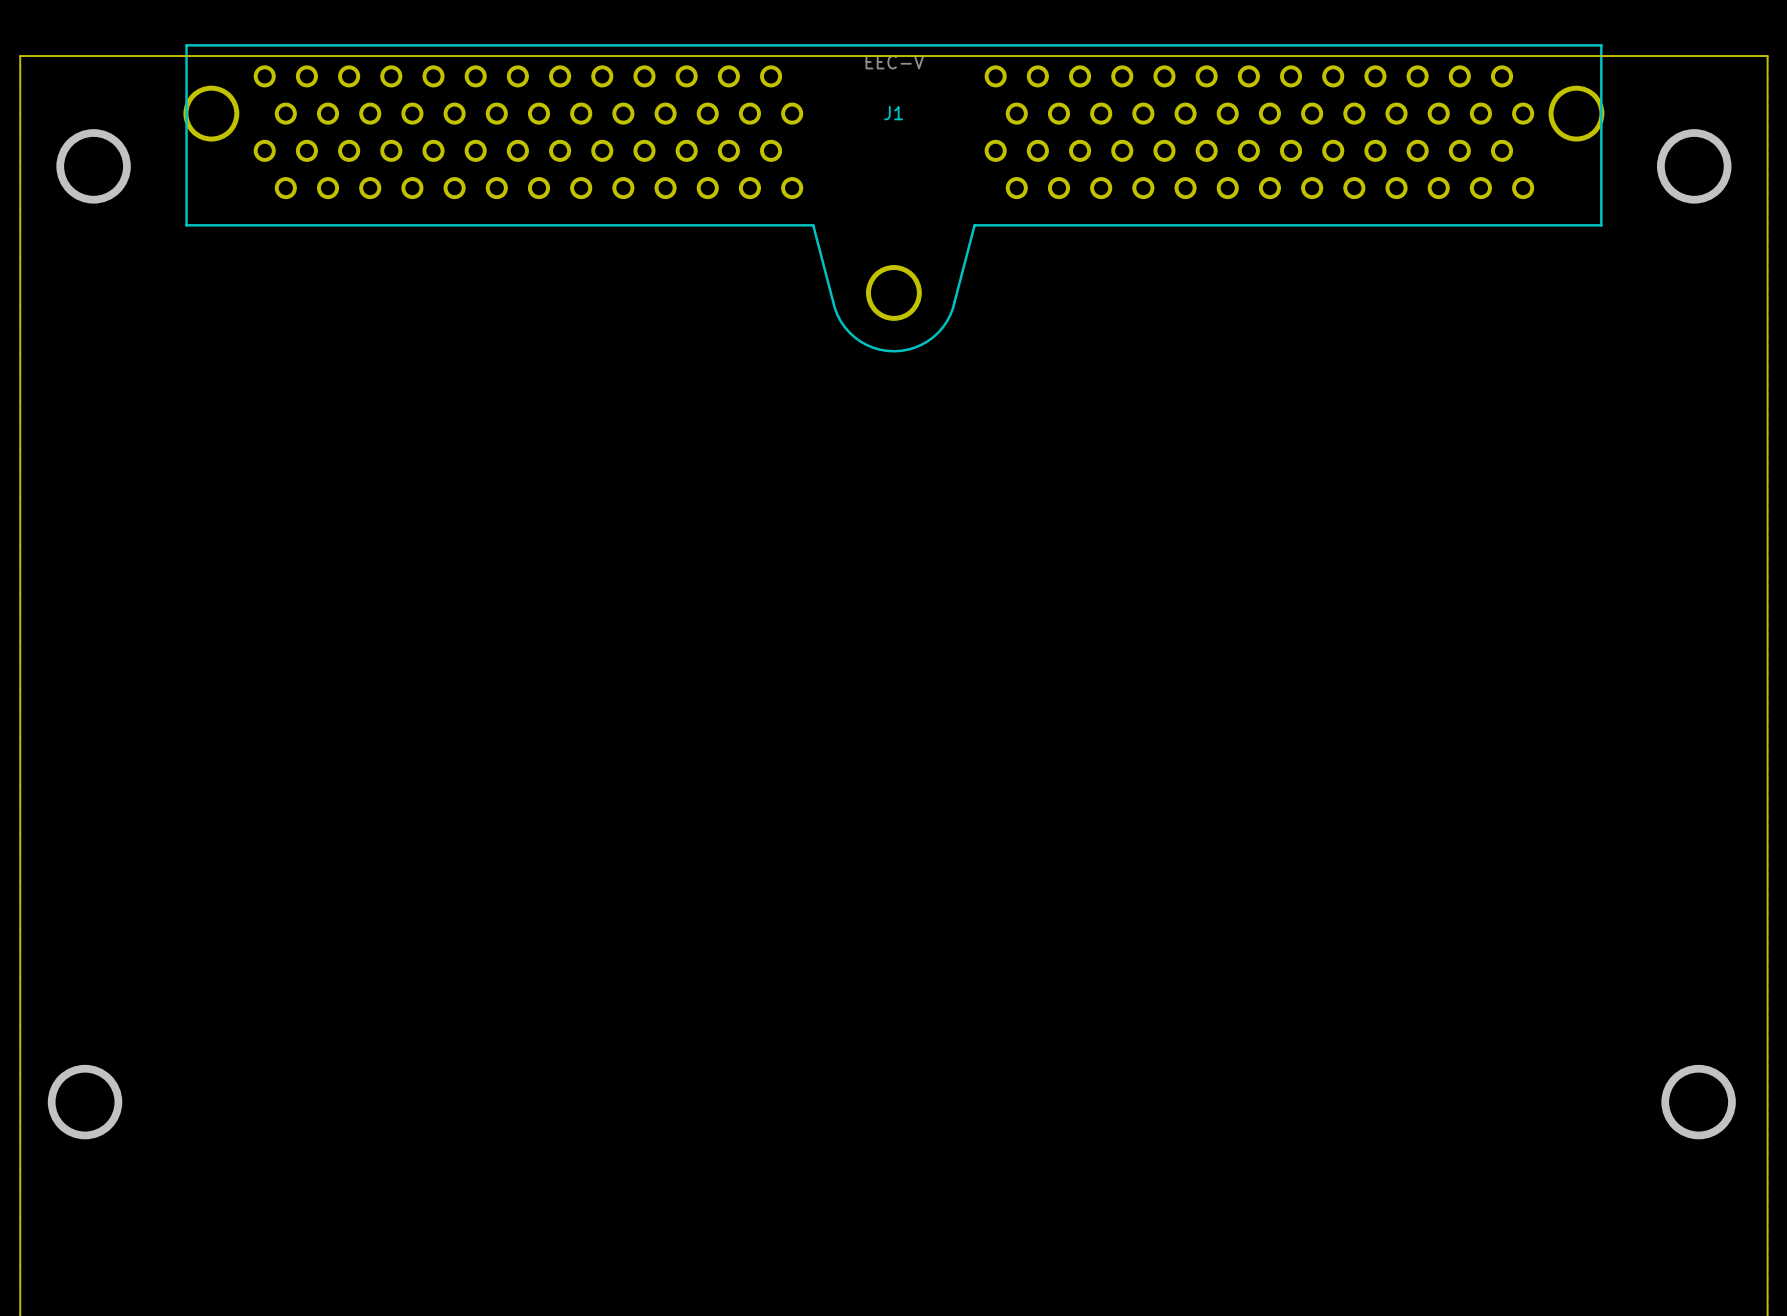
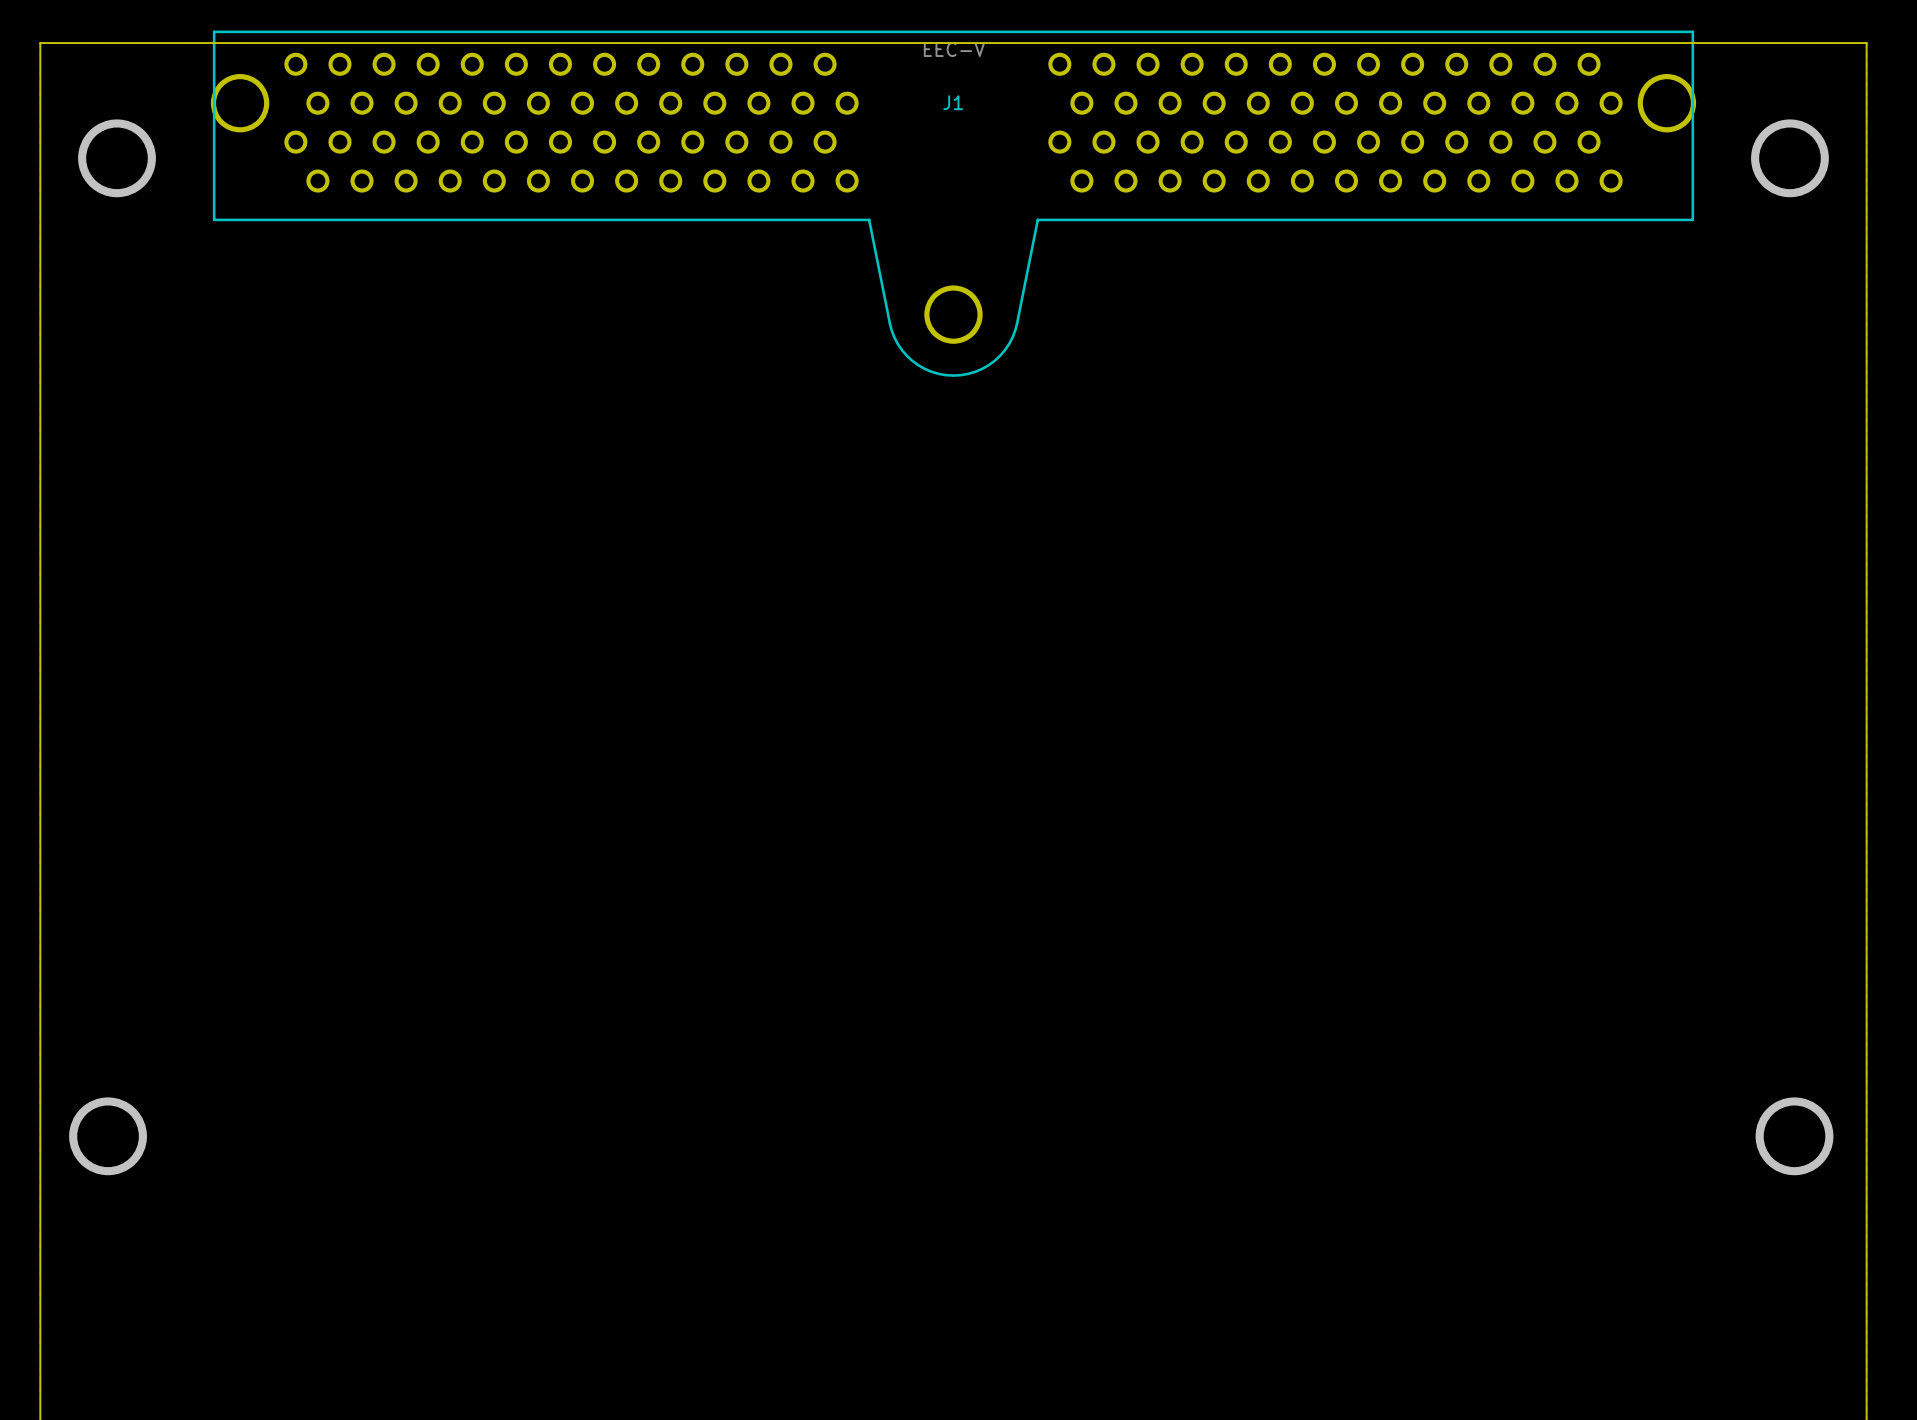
J1 footprint: [183, 44, 1605, 353] -> [210, 30, 1697, 377]

